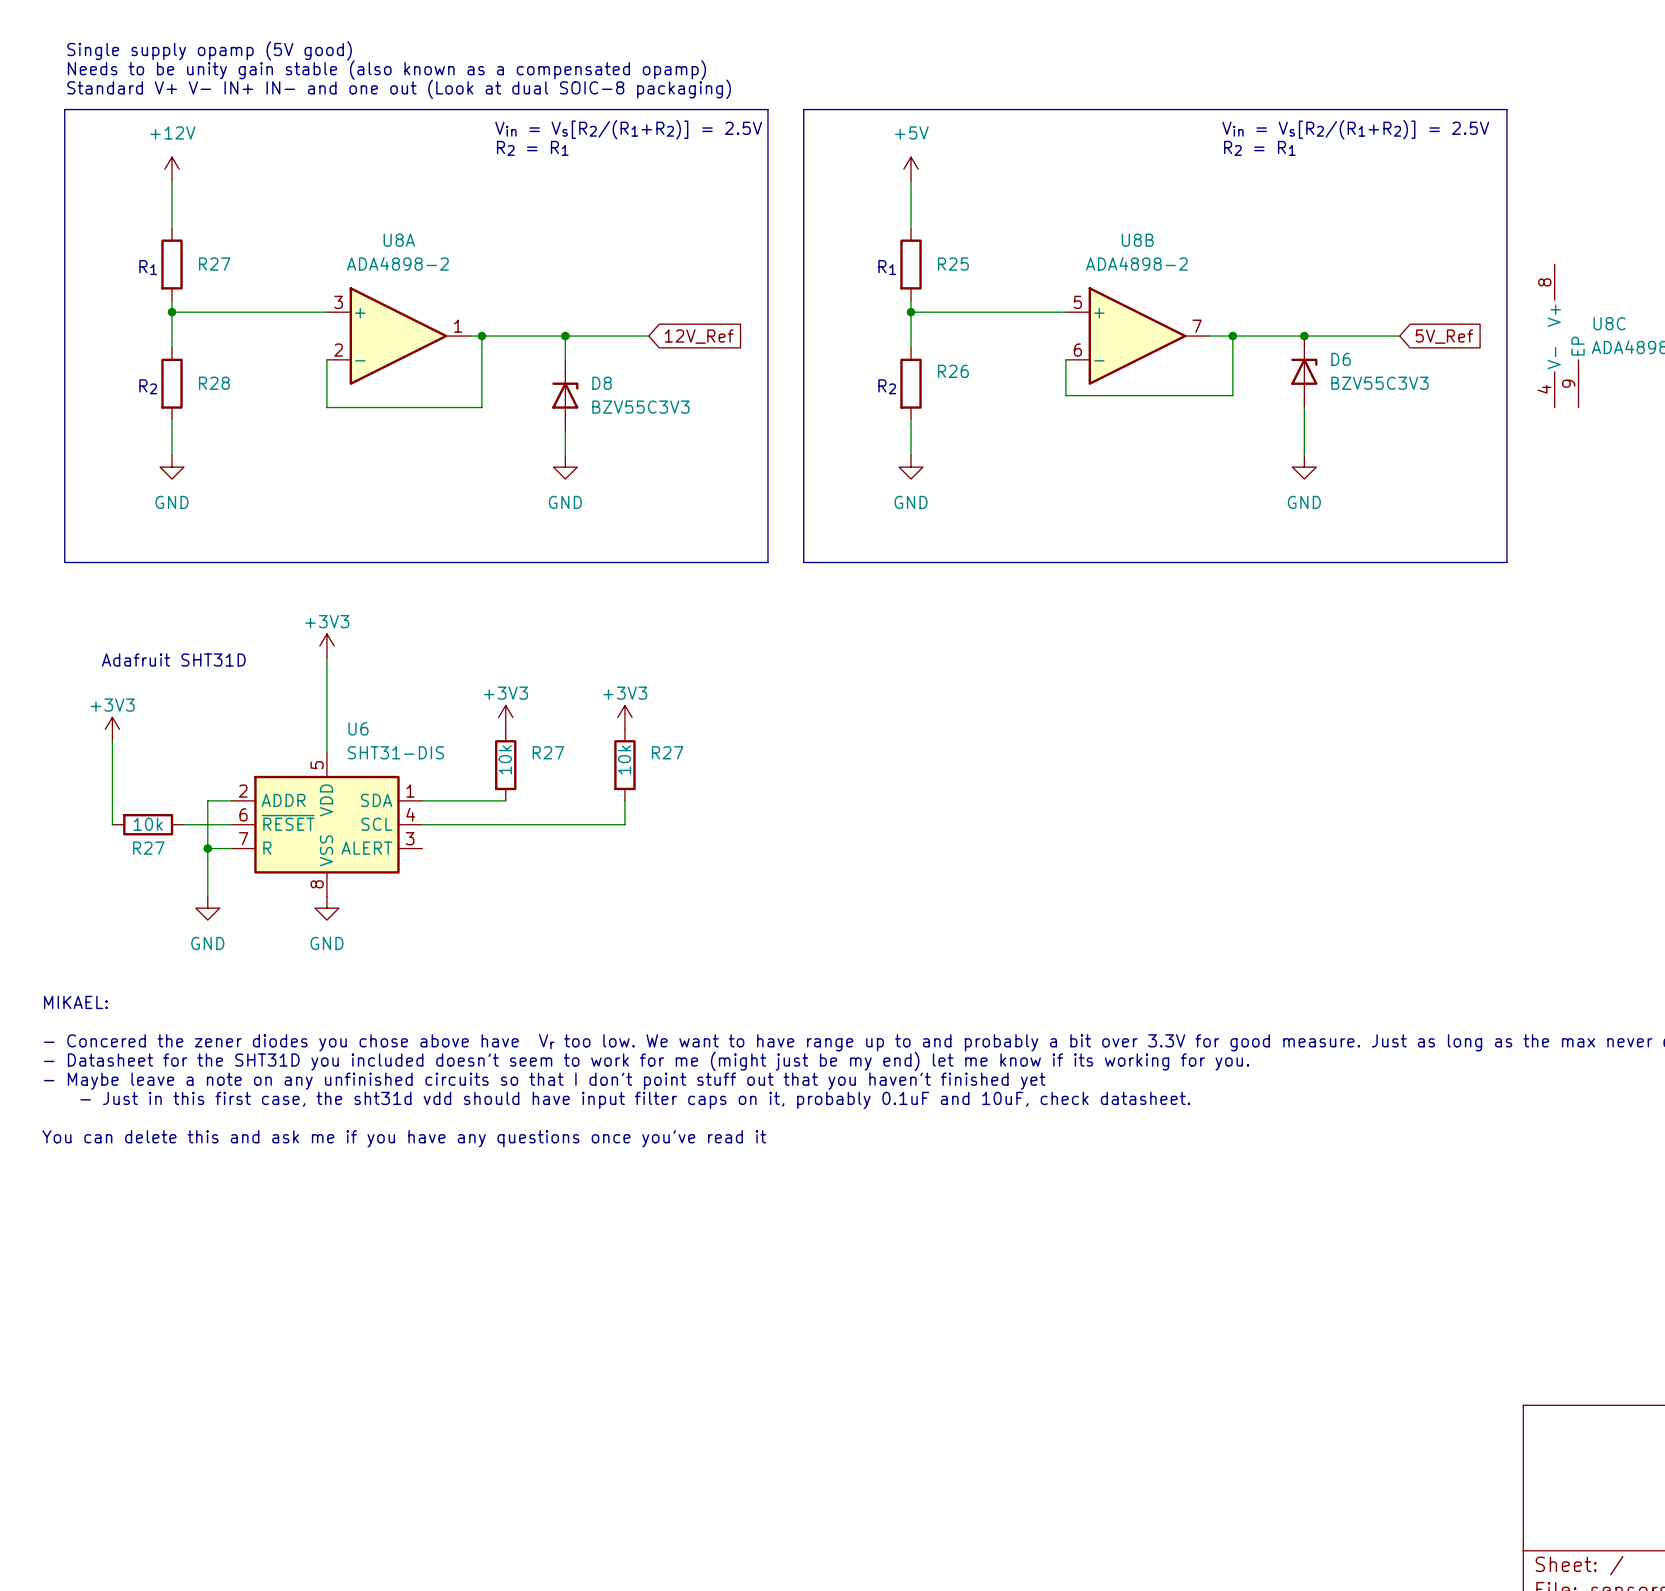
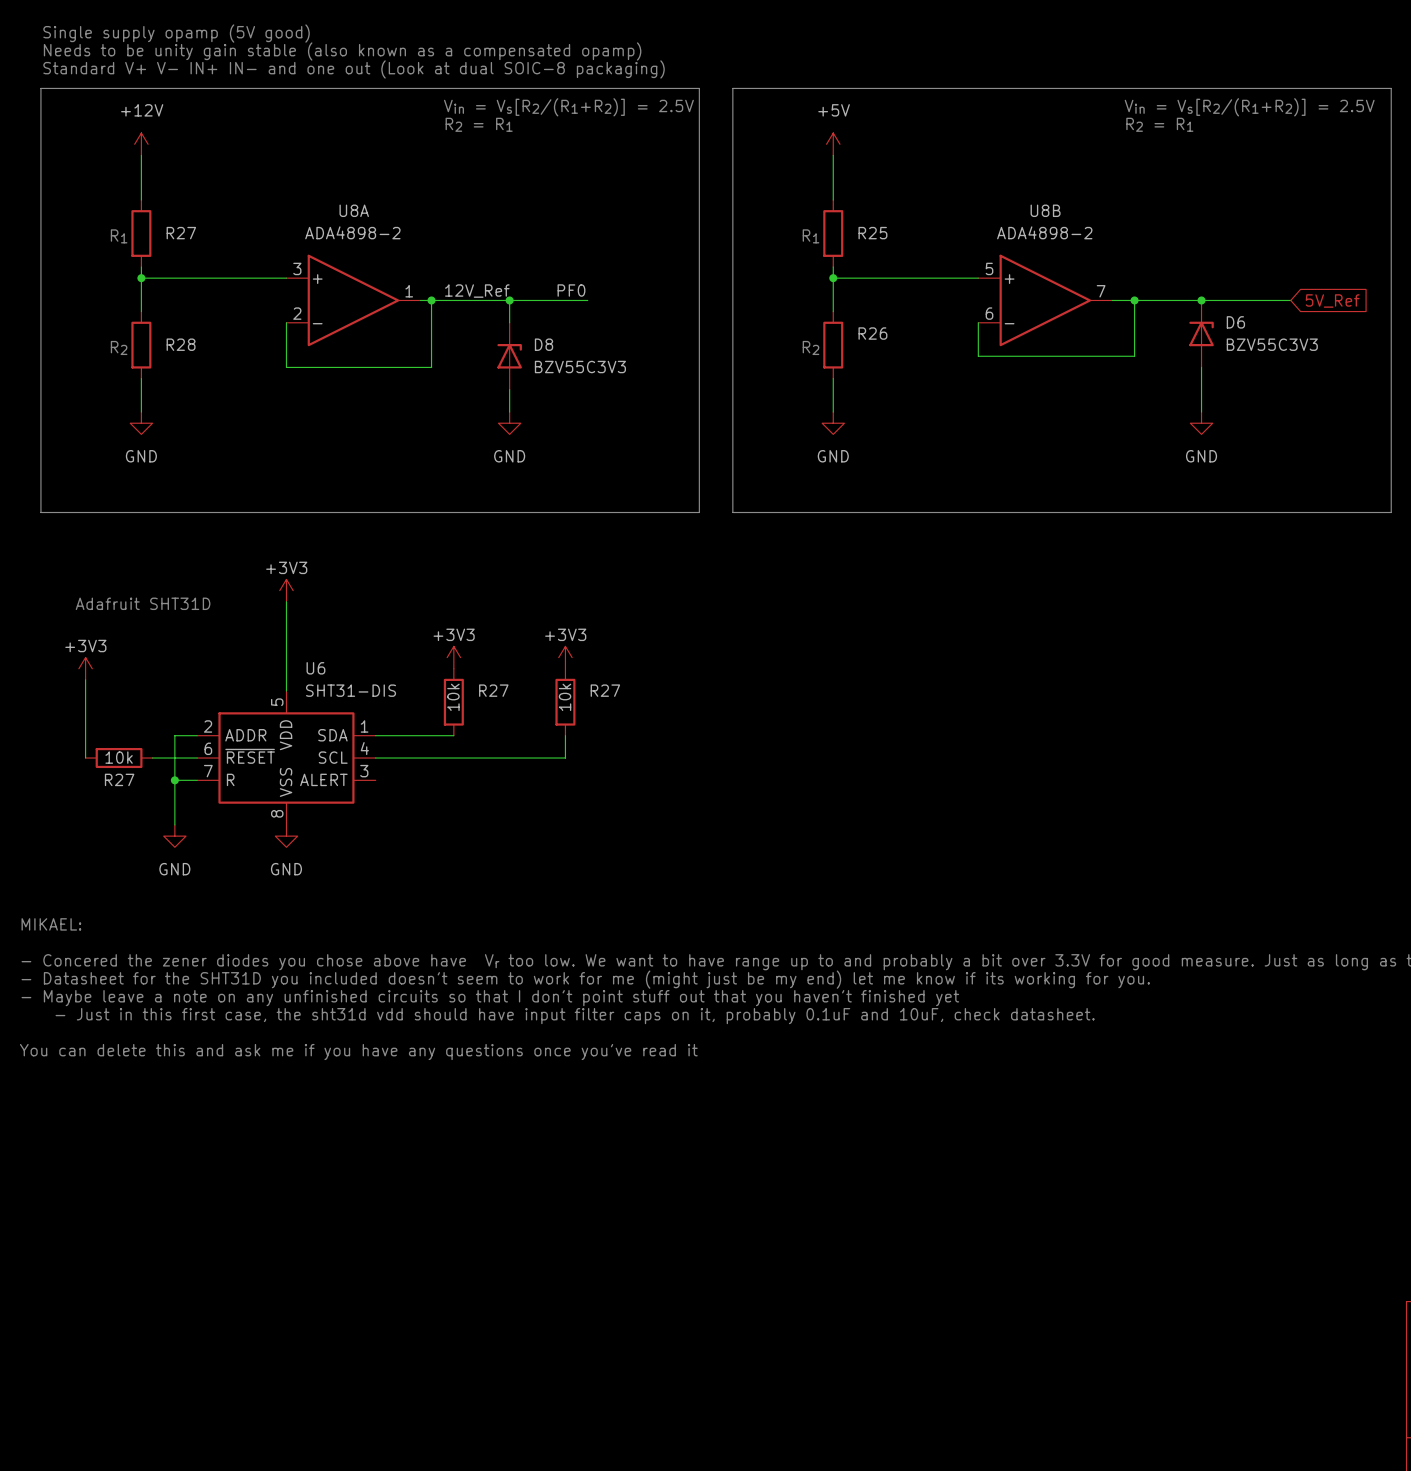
label: none -> 12V_Ref (477, 291)
label: none -> PF0 (571, 290)
global label: 12V_Ref (699, 336) -> none

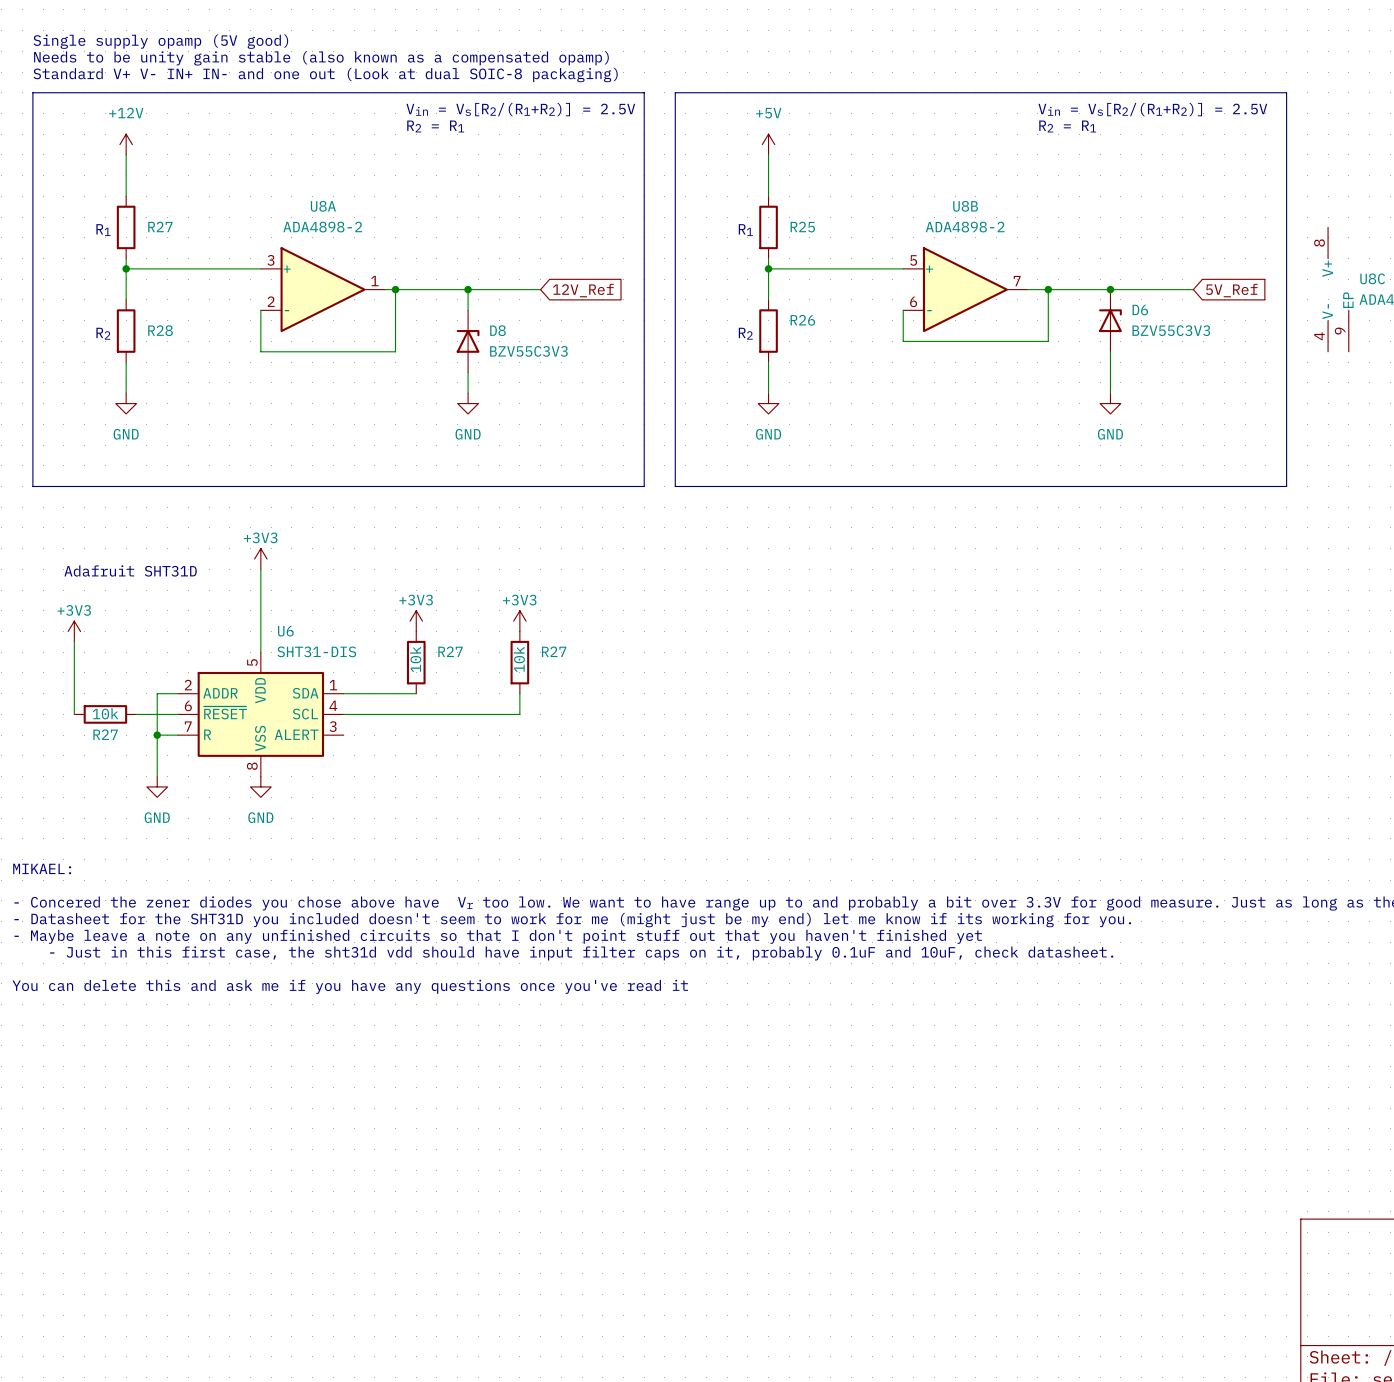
label: PF0 (571, 290) -> none
label: 12V_Ref (477, 291) -> none
global label: none -> 12V_Ref (583, 290)

